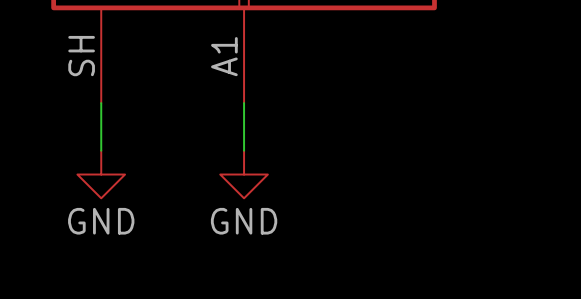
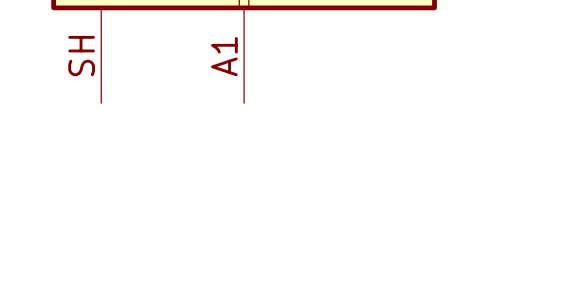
wire: (101, 103) (101, 150) -> none
wire: (244, 103) (244, 150) -> none
power symbol: GND (101, 174) -> none
power symbol: GND (244, 174) -> none

